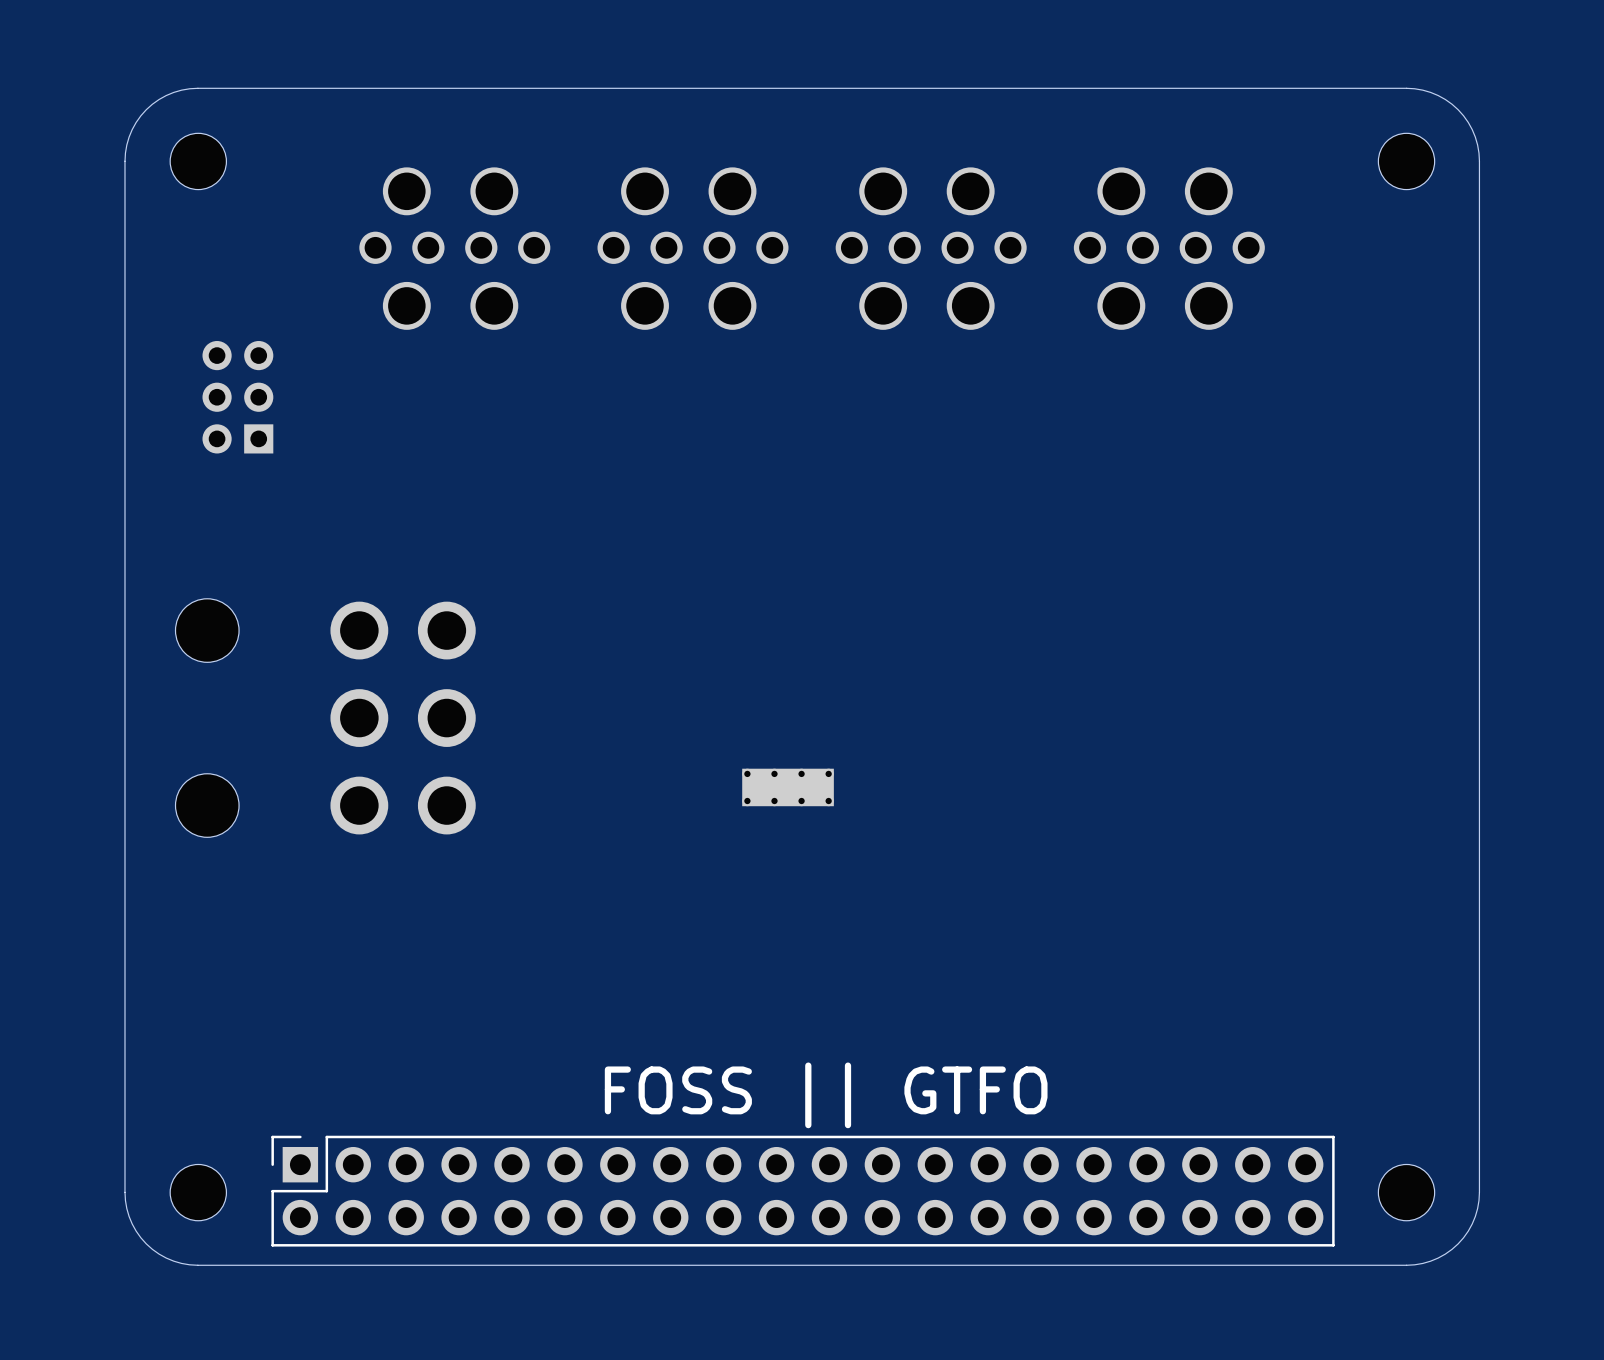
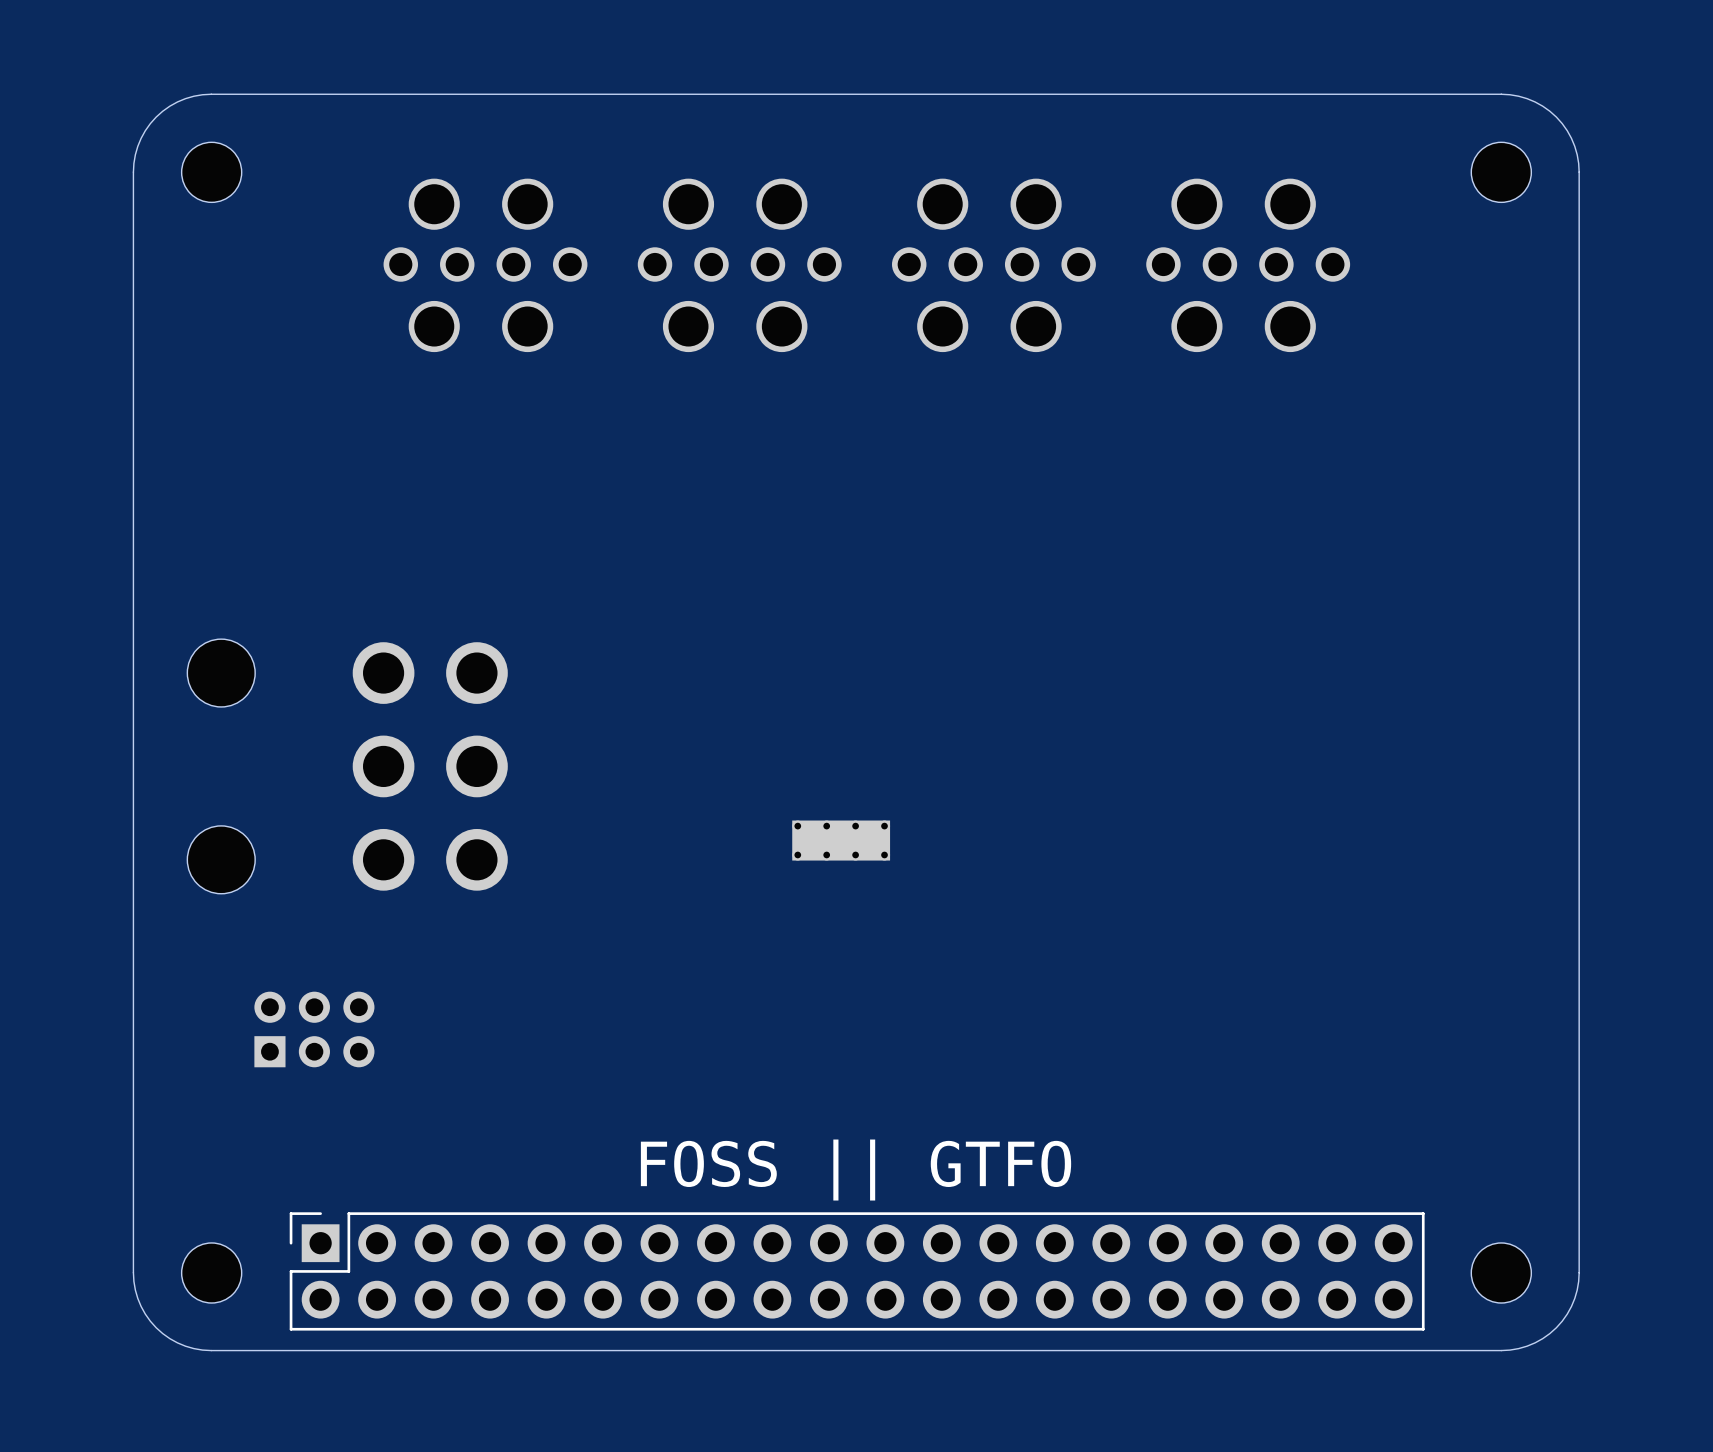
part: (237, 397) -> none
part: none -> (314, 1029)

